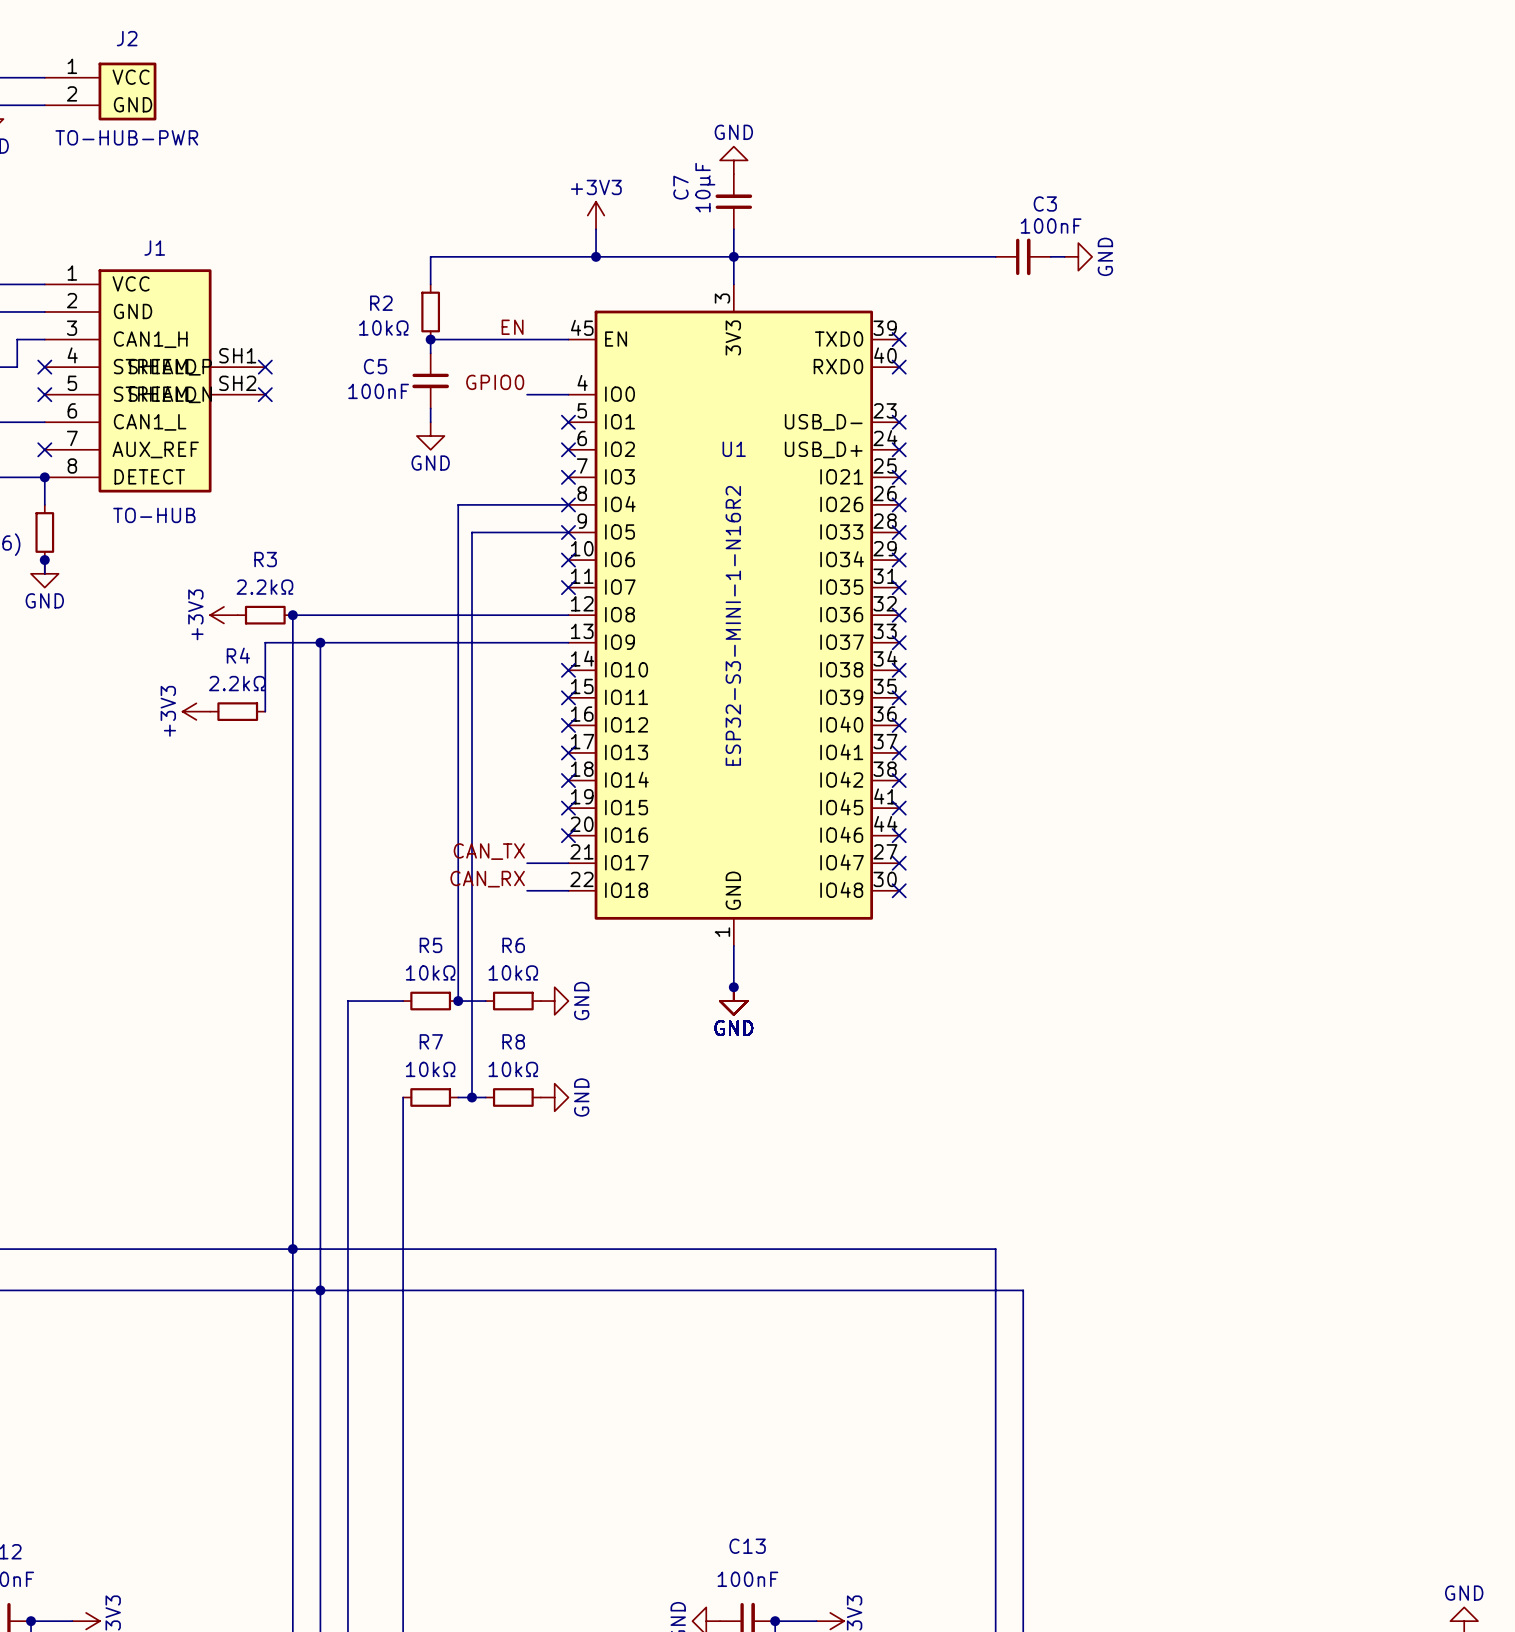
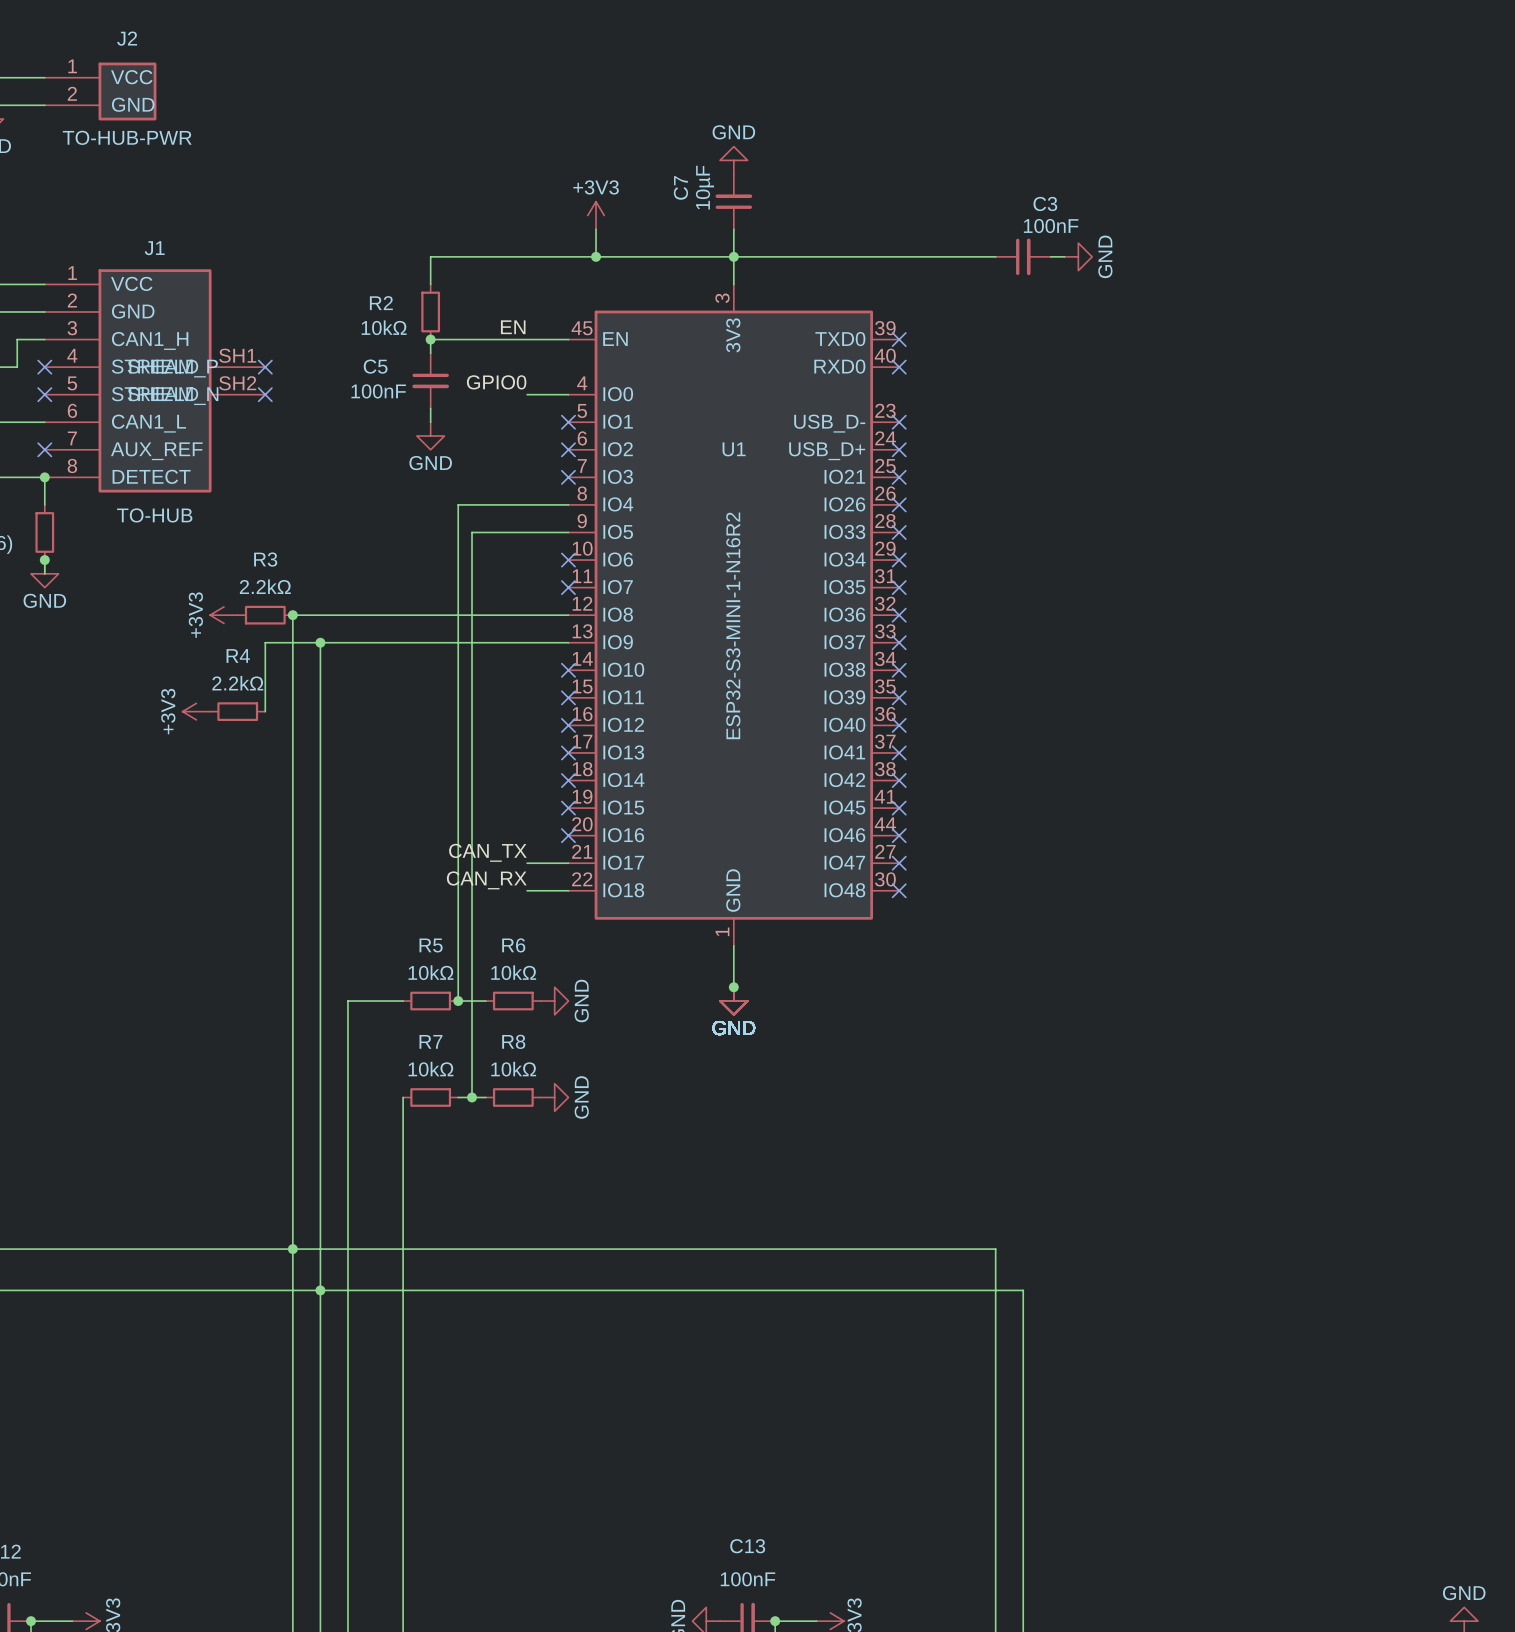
no-connect mark: (568, 504) -> none
no-connect mark: (568, 532) -> none

